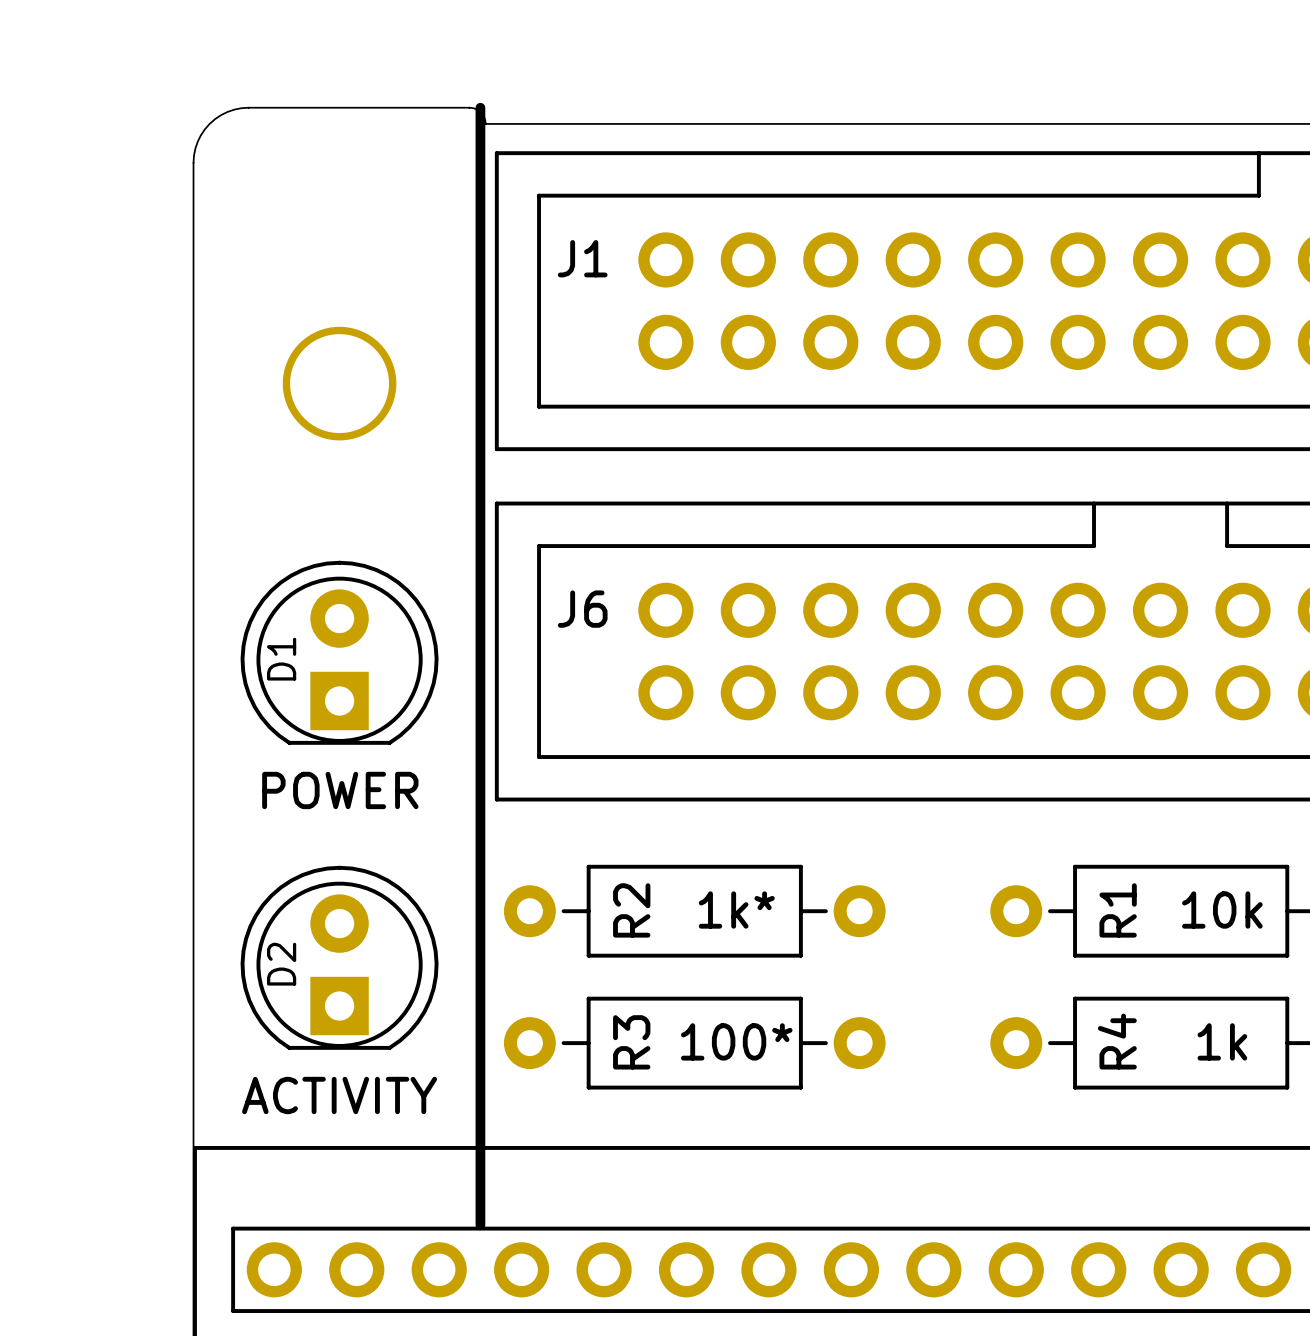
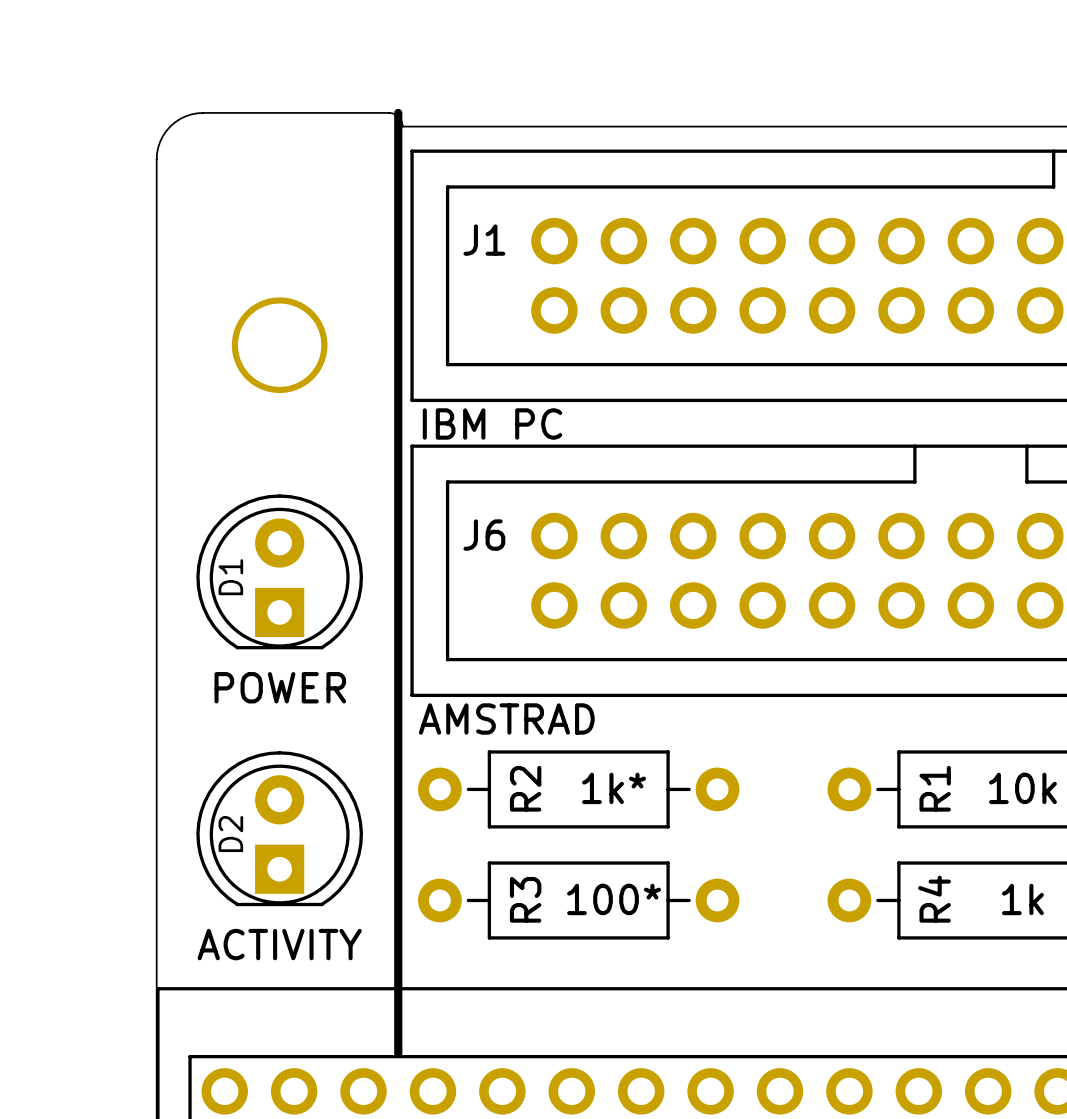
text: none -> IBM PC (492, 424)
text: none -> AMSTRAD (506, 718)

